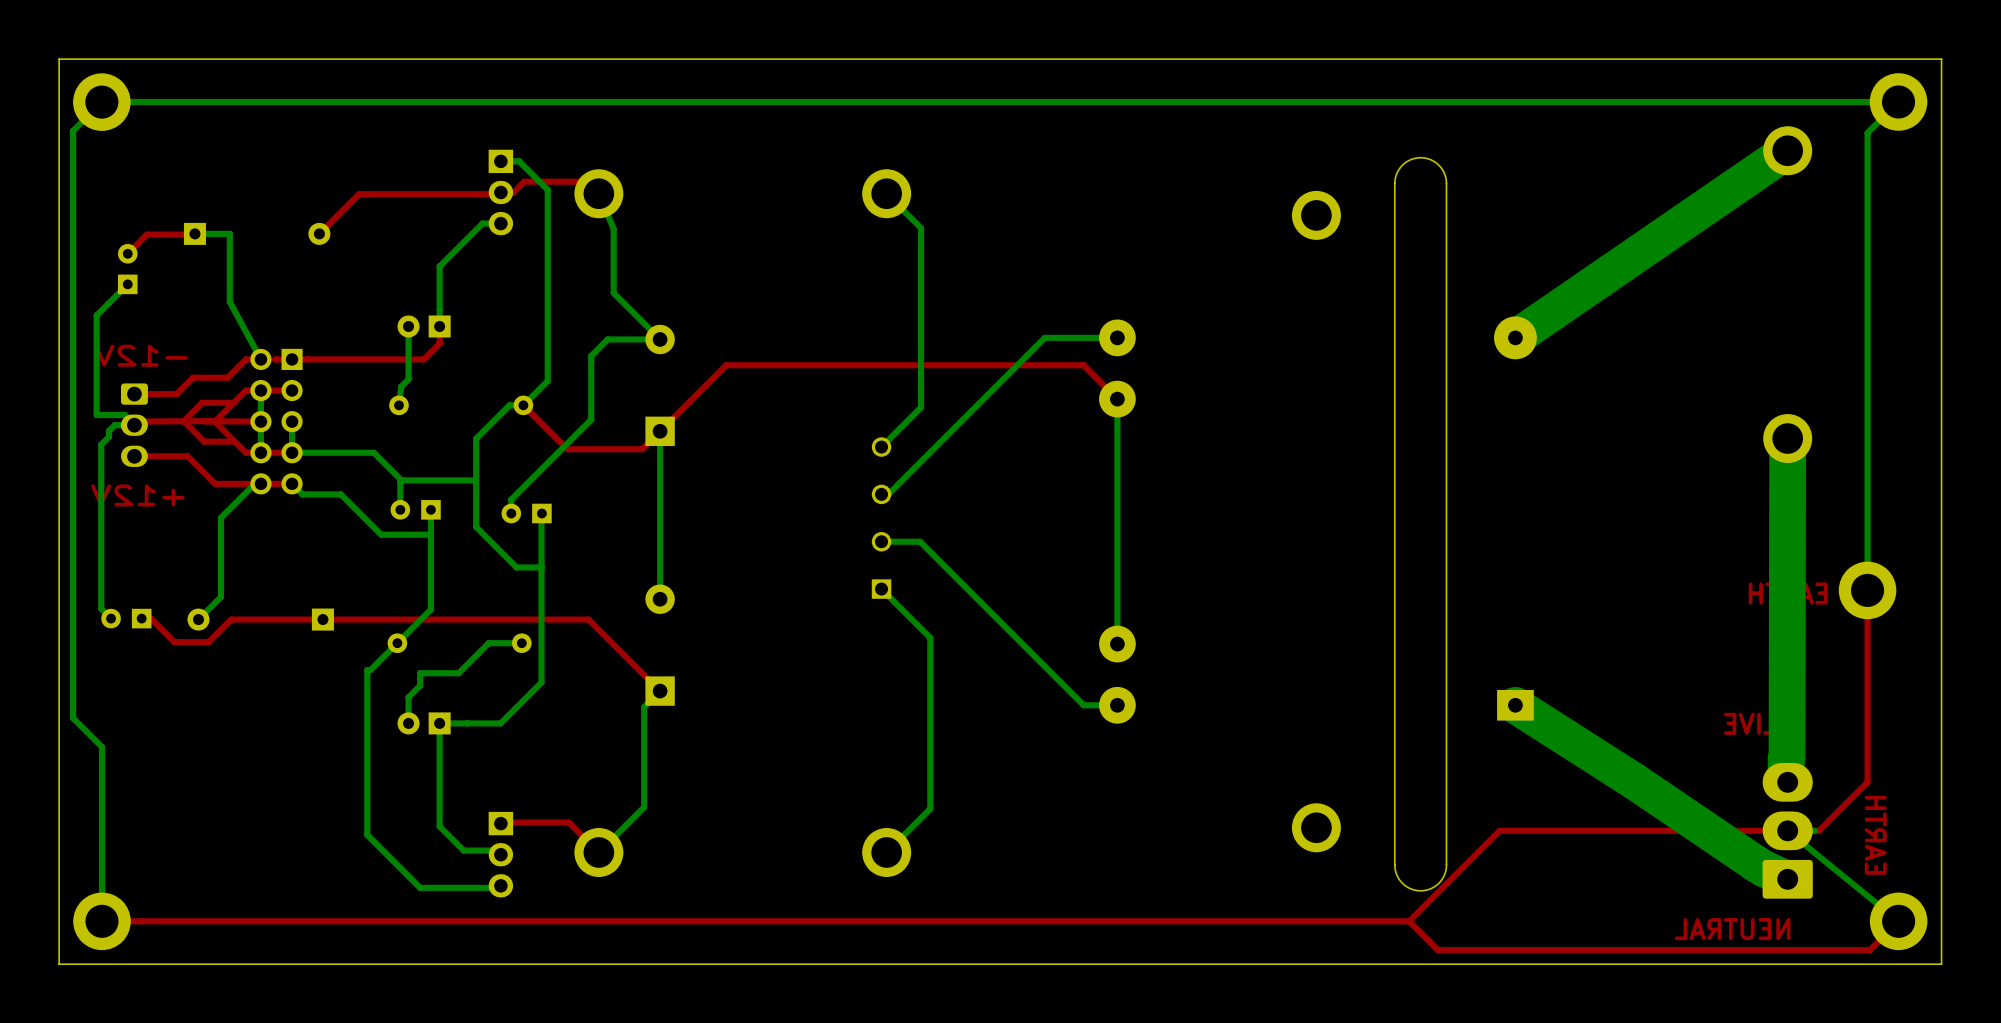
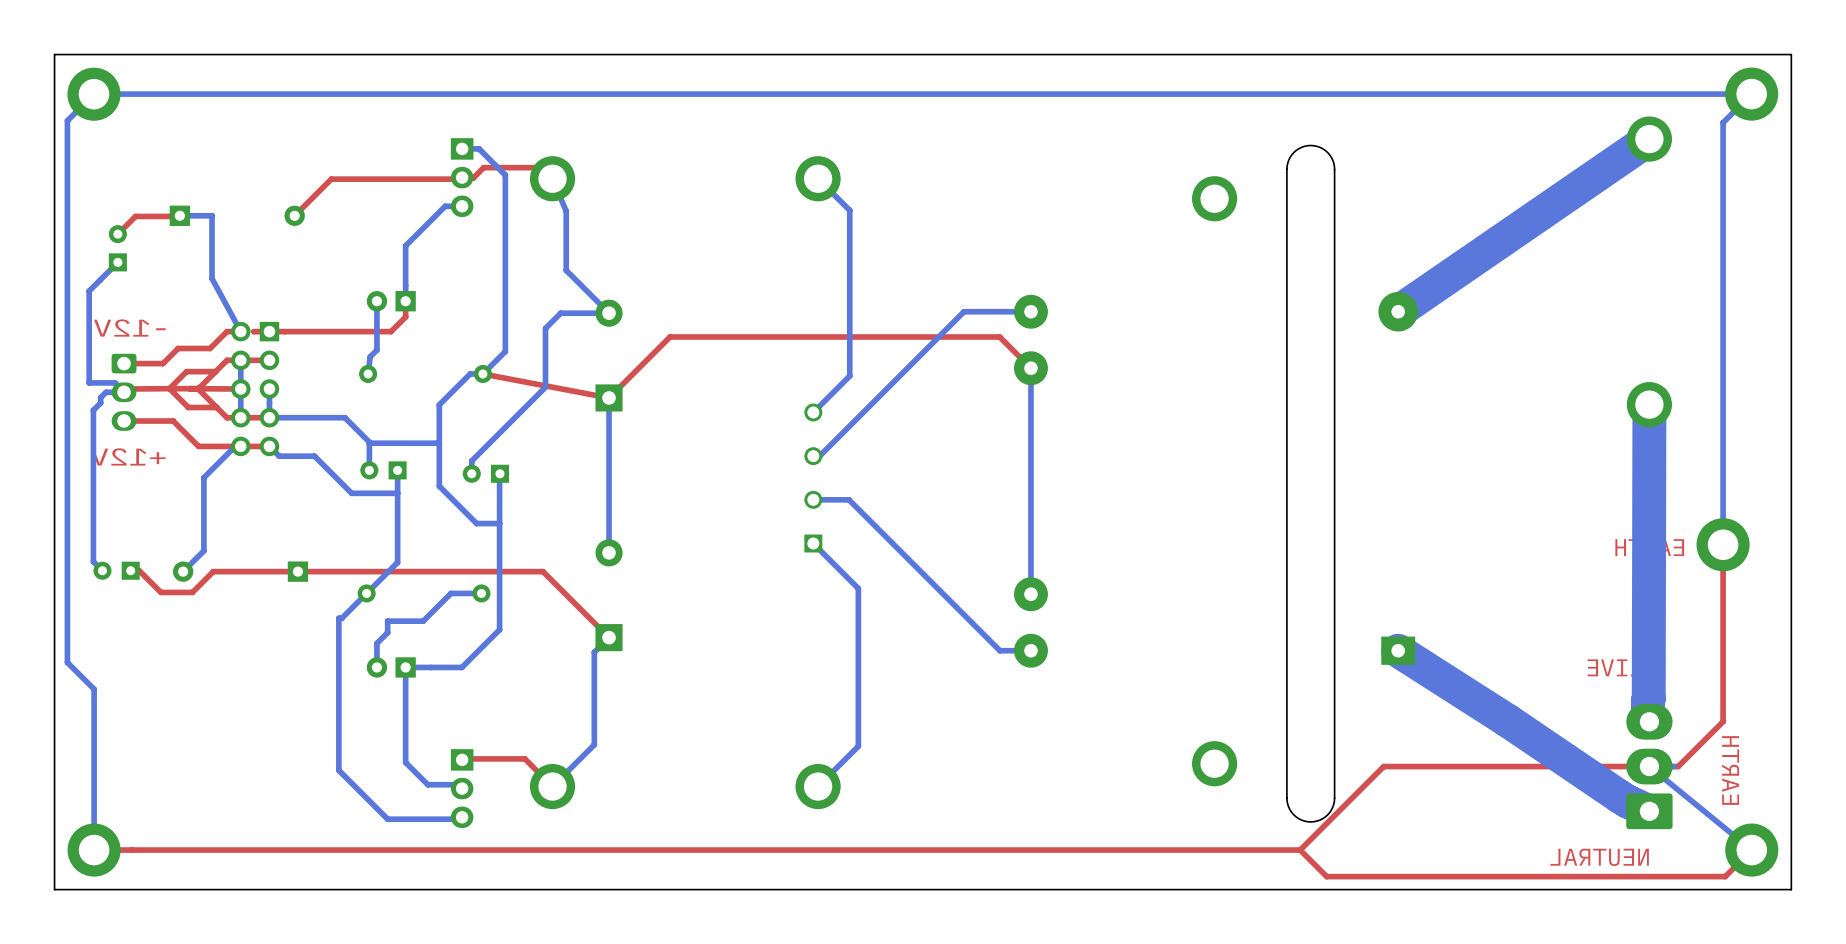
top track: (523, 405) (567, 449) (642, 449) (660, 431) -> (482, 374) (609, 397)

